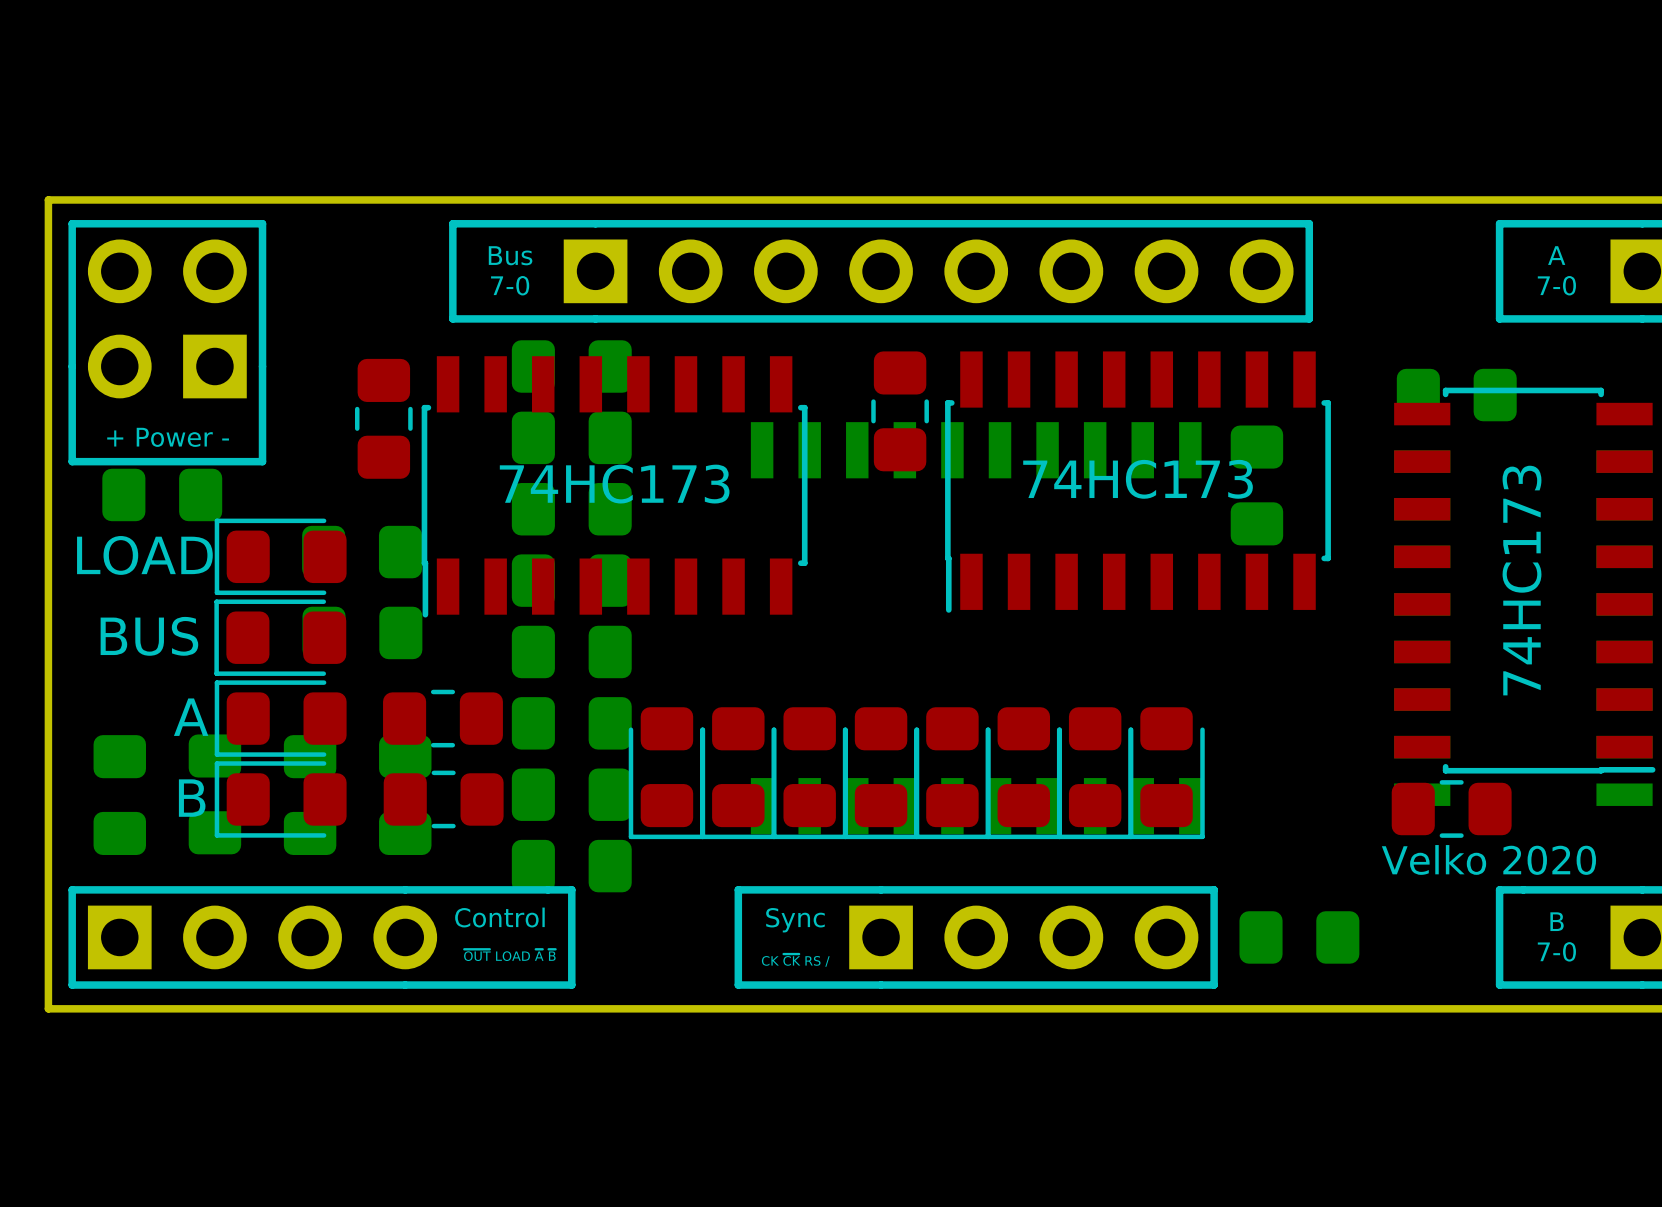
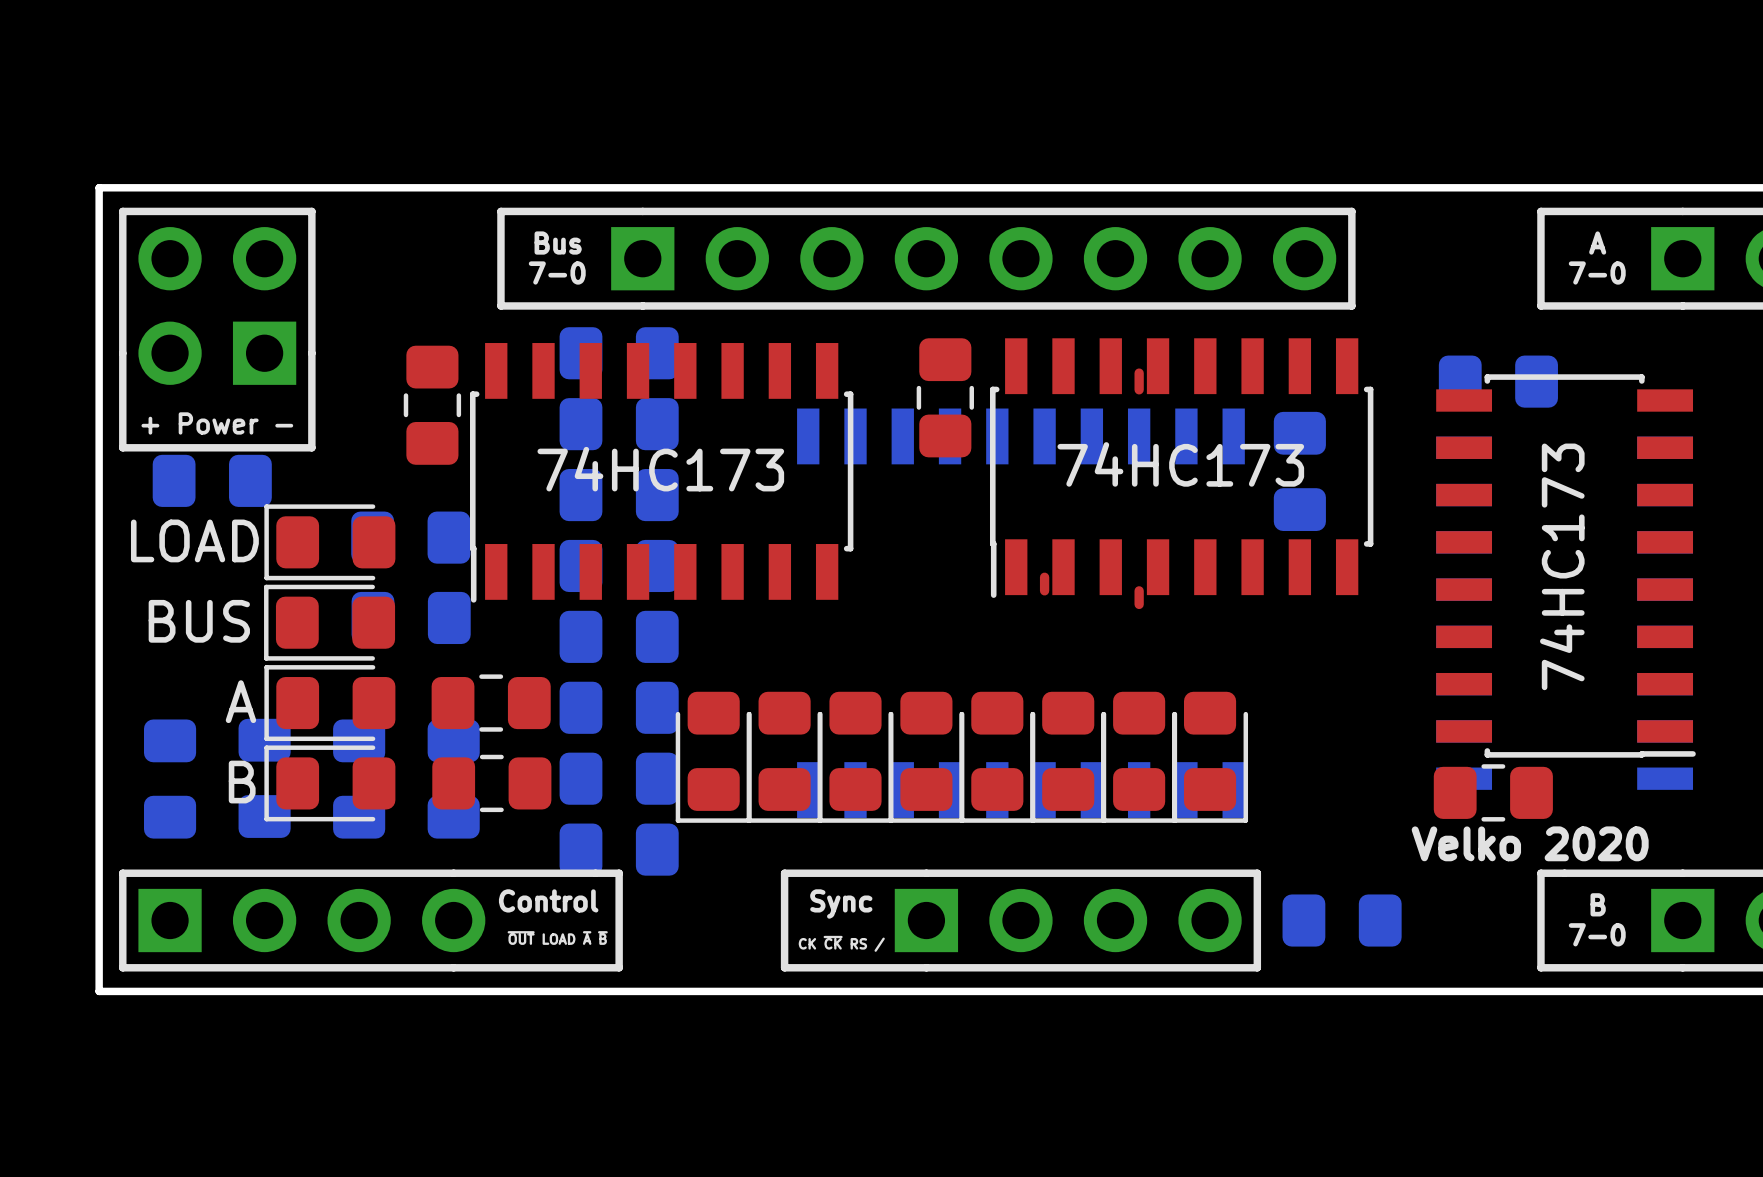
top track: none -> (1139, 373) (1139, 389)
top track: none -> (1044, 577) (1044, 590)
top track: none -> (1139, 590) (1139, 604)

